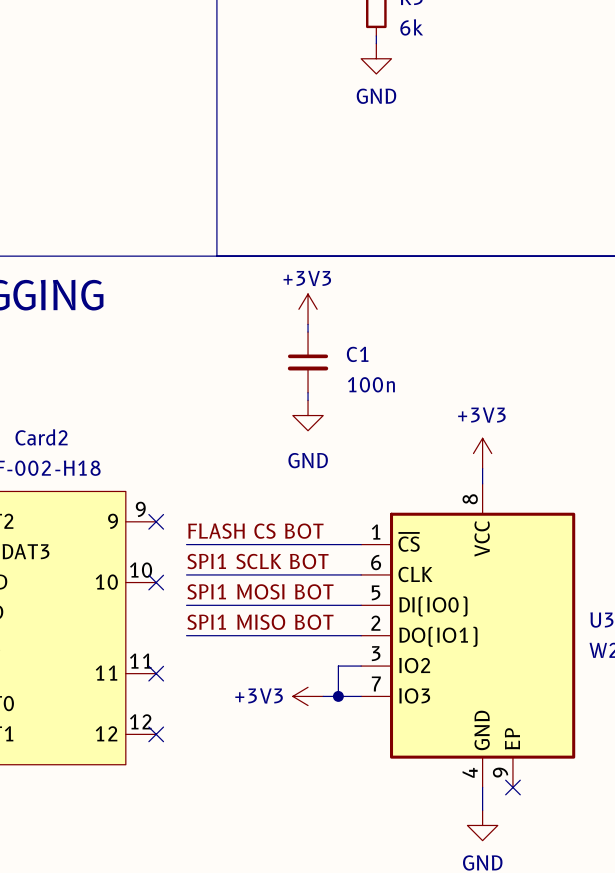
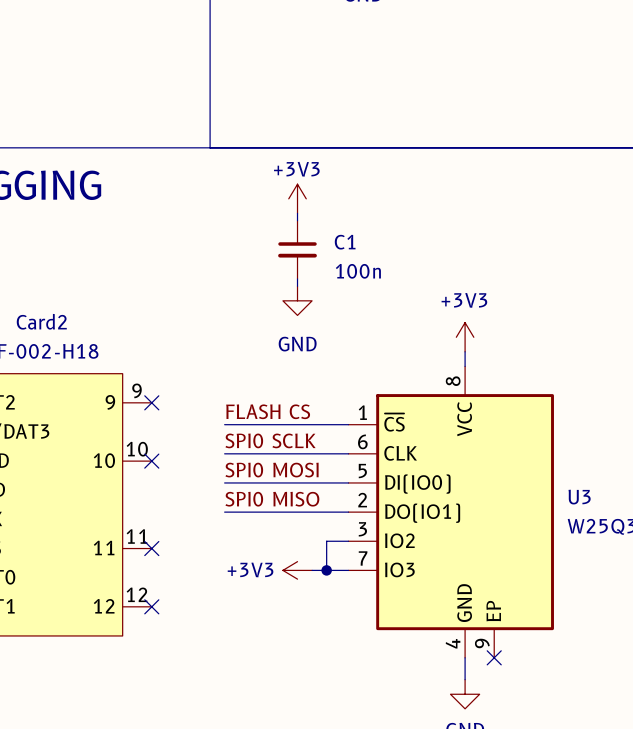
label: FLASH CS BOT (255, 531) -> FLASH CS (268, 411)
wire: (186, 544) (232, 544) -> none
label: SPI1 SCLK BOT (257, 561) -> SPI0 SCLK (270, 440)
wire: (186, 574) (232, 574) -> none
label: SPI1 MOSI BOT (260, 591) -> SPI0 MOSI (272, 470)
wire: (186, 605) (232, 605) -> none
label: SPI1 MISO BOT (260, 622) -> SPI0 MISO (272, 499)
wire: (186, 635) (232, 635) -> none

